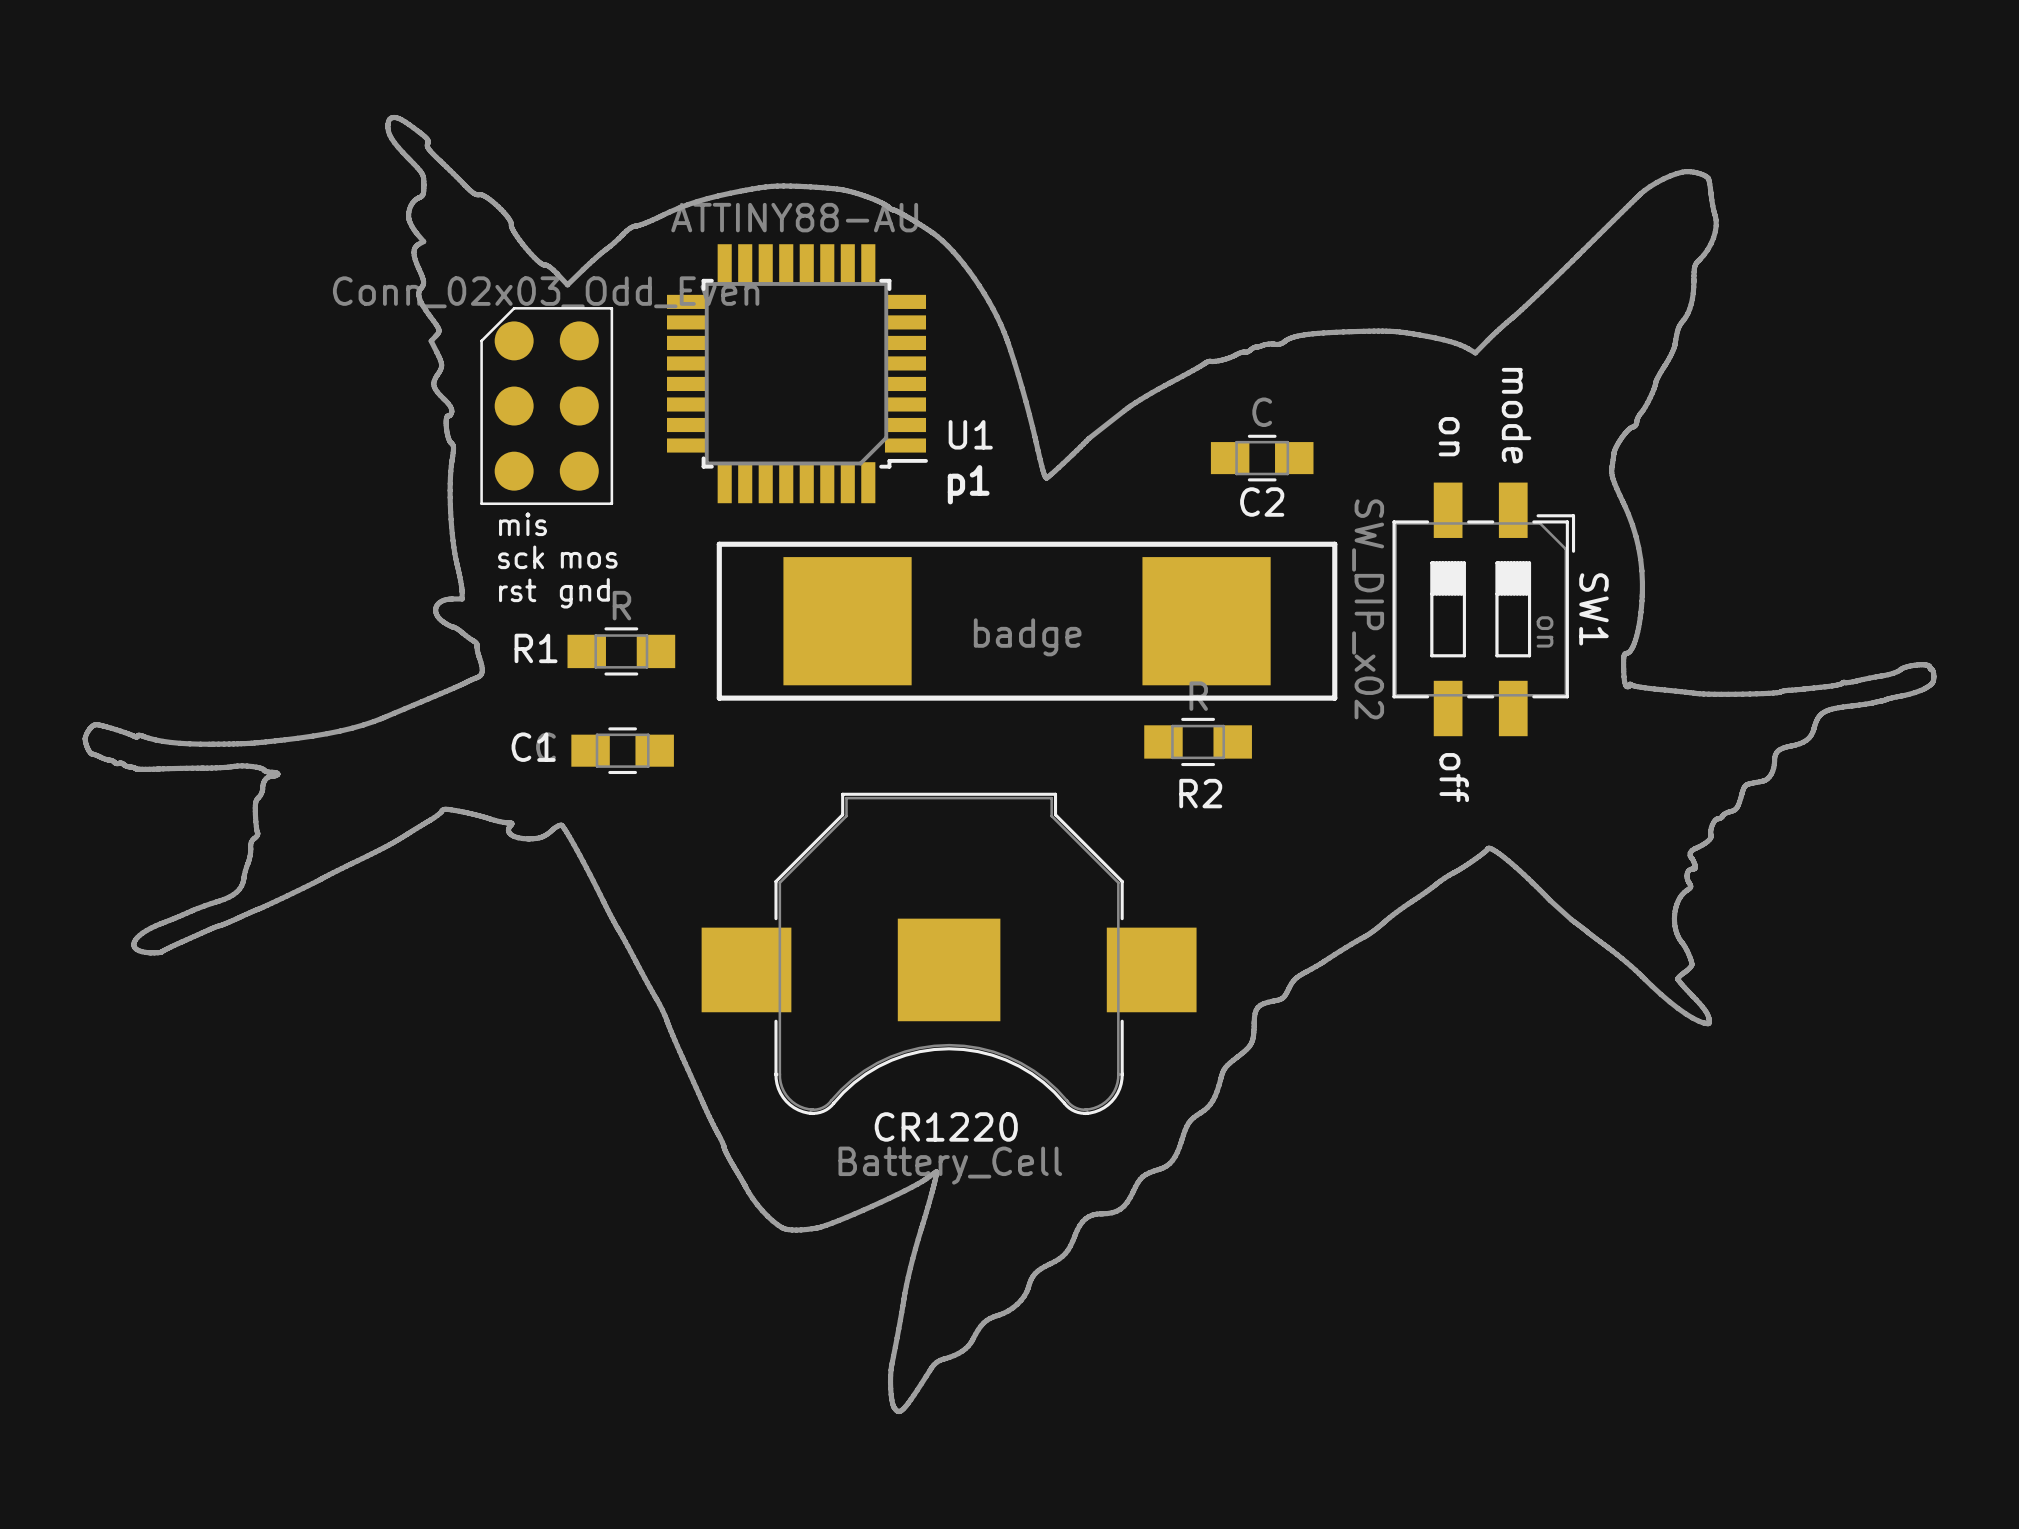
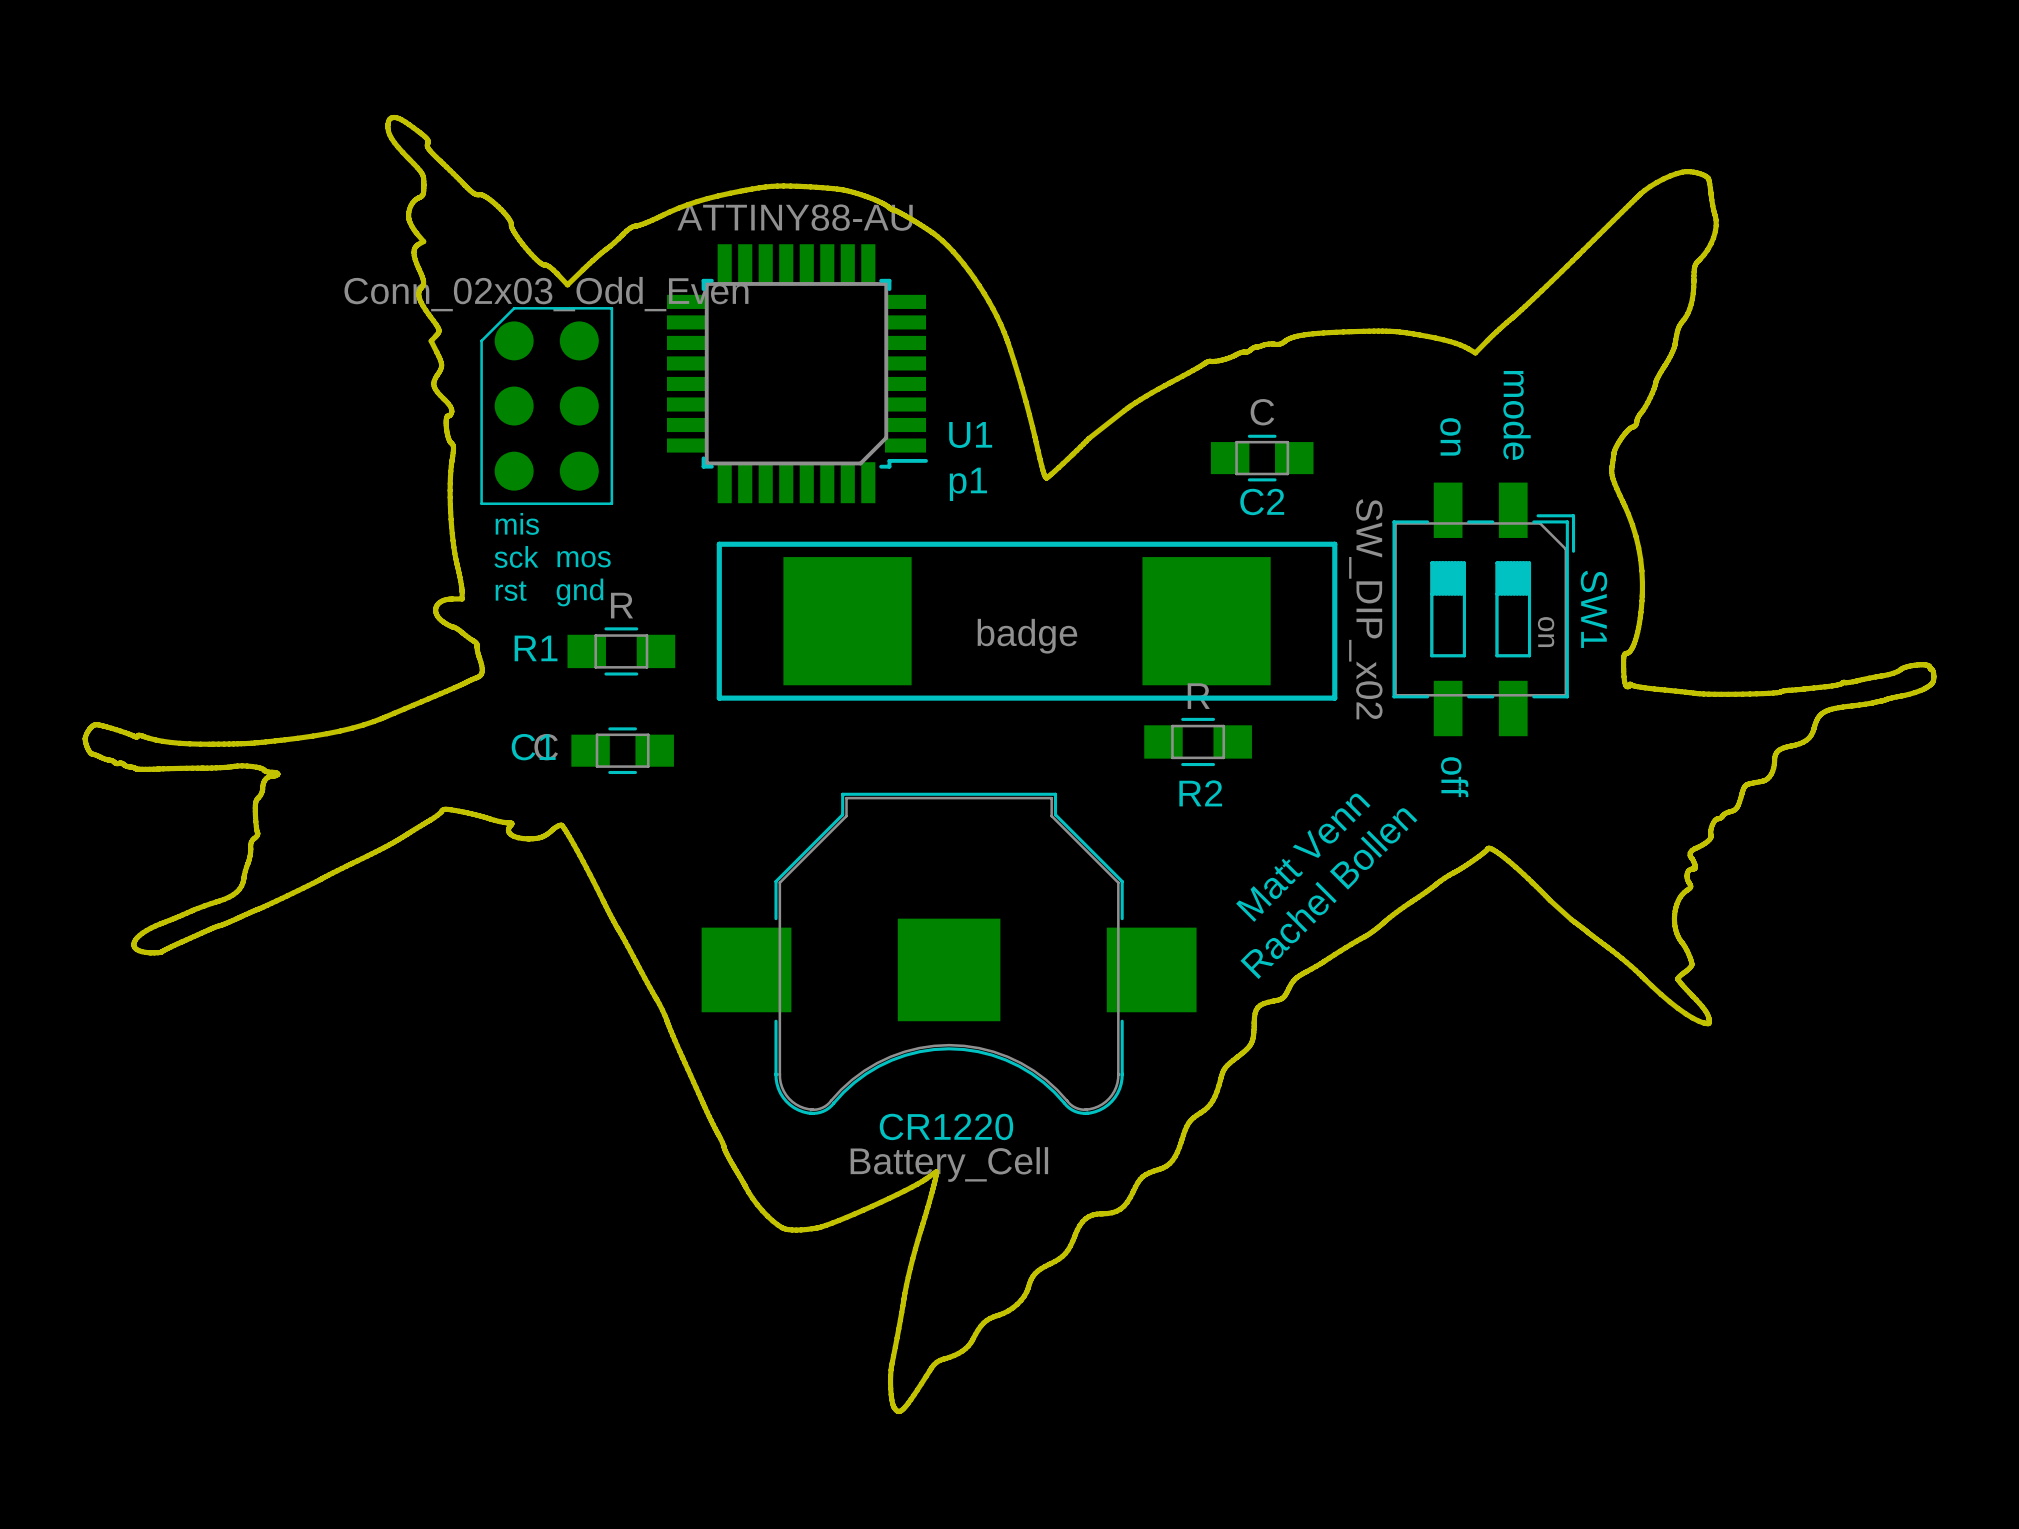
text: none -> Matt Venn (1303, 857)
text: none -> Rachel Bollen (1328, 893)

